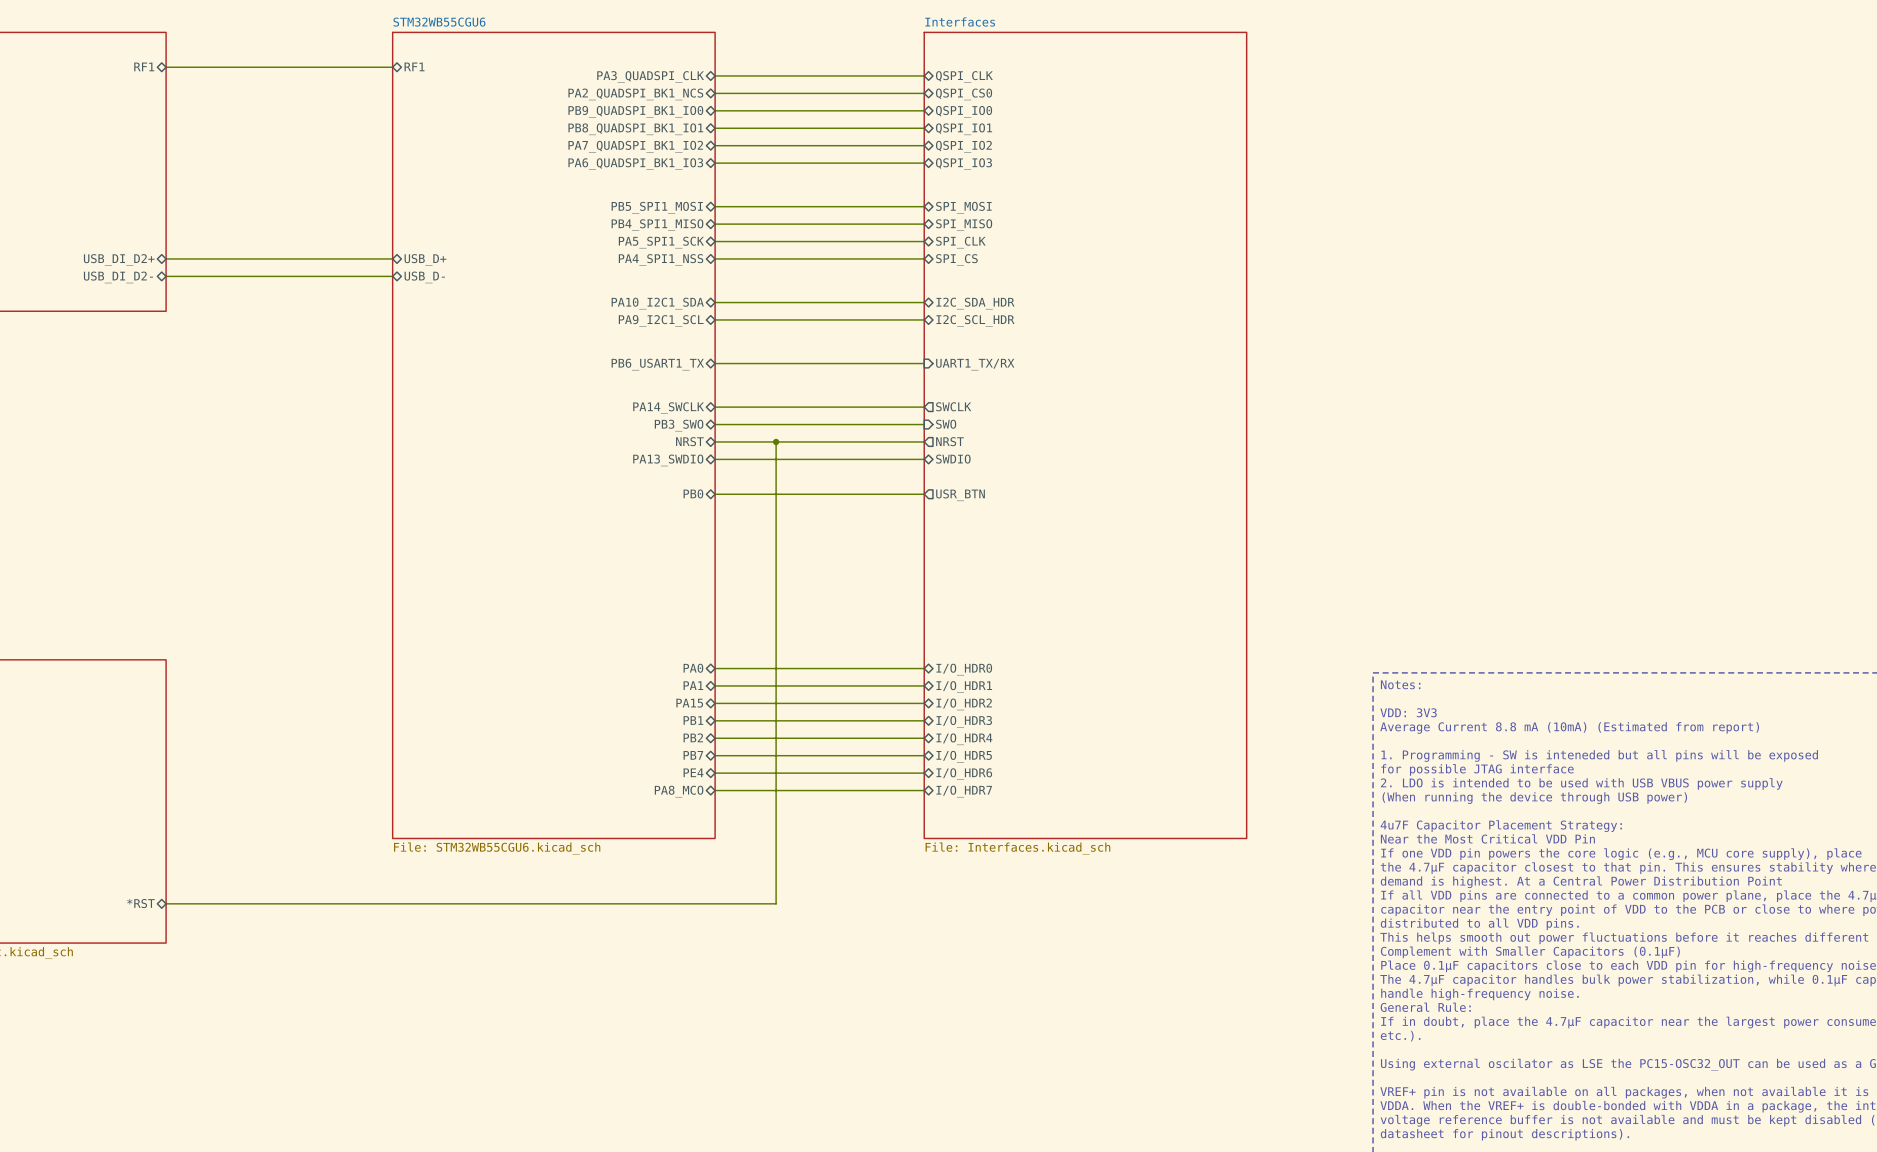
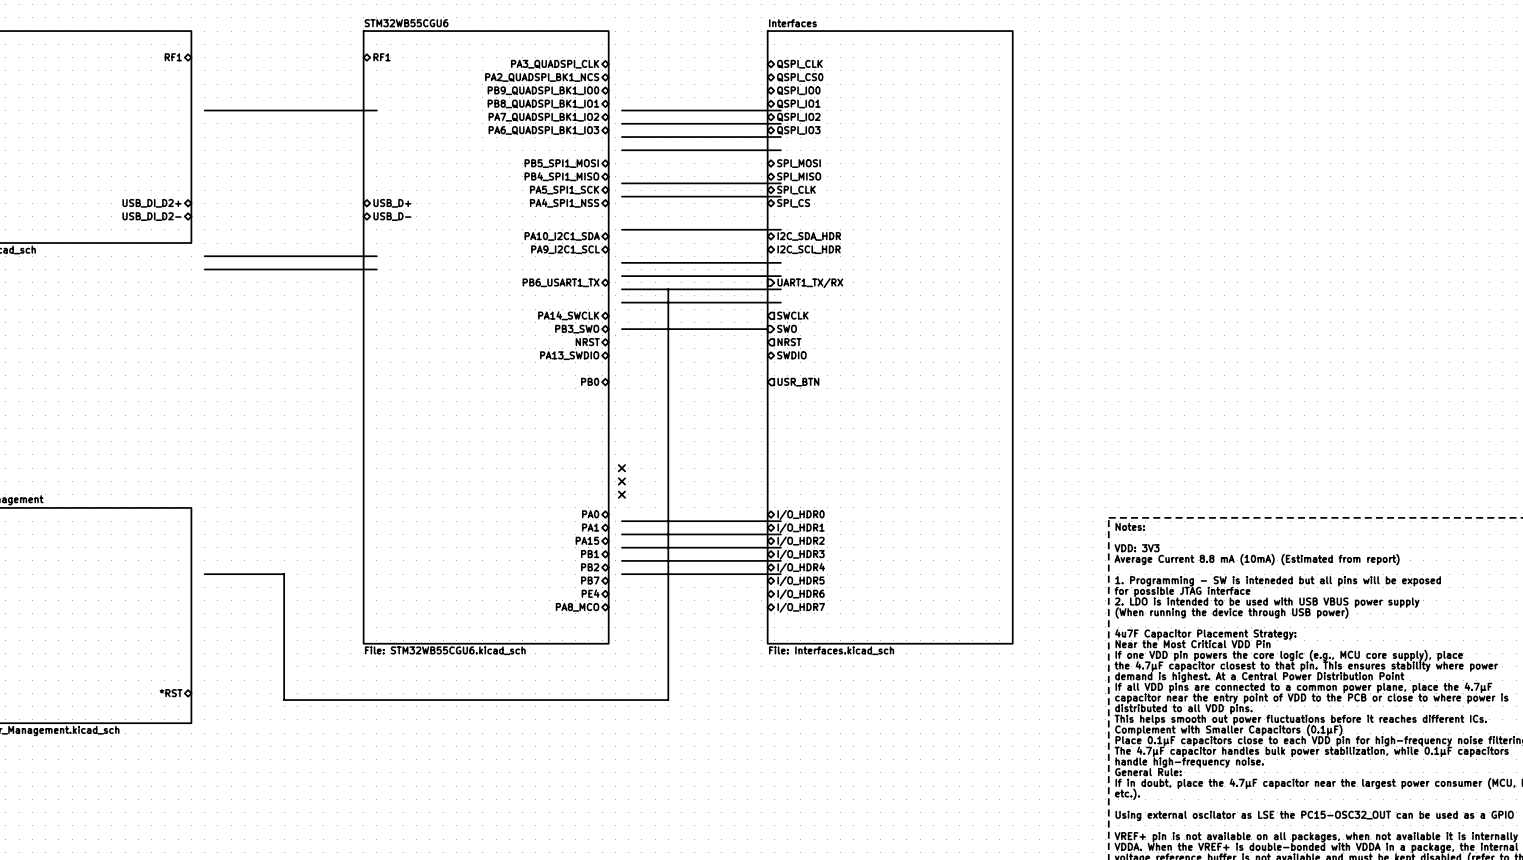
wire: (166, 67) (392, 67) -> (204, 110) (376, 110)
wire: (715, 75) (924, 75) -> none
wire: (715, 93) (924, 93) -> none
wire: (715, 110) (924, 110) -> none
wire: (715, 128) (924, 128) -> (621, 110) (780, 110)
wire: (715, 145) (924, 145) -> (621, 123) (780, 123)
wire: (715, 163) (924, 163) -> (621, 137) (780, 137)
wire: (715, 206) (924, 206) -> none
wire: (715, 224) (924, 224) -> (621, 183) (780, 183)
wire: (715, 241) (924, 241) -> (621, 196) (780, 196)
wire: (166, 258) (392, 258) -> (204, 256) (376, 256)
wire: (715, 258) (924, 258) -> (621, 150) (780, 150)
wire: (166, 276) (392, 276) -> (204, 269) (376, 269)
wire: (715, 302) (924, 302) -> (621, 229) (780, 229)
wire: (715, 319) (924, 319) -> none
wire: (715, 363) (924, 363) -> (621, 276) (780, 276)
wire: none -> (668, 289) (668, 700) (284, 700) (284, 574) (204, 574)
wire: (715, 407) (924, 407) -> (621, 262) (780, 262)
wire: (715, 424) (732, 424) -> none
wire: (715, 441) (924, 441) -> (621, 289) (780, 289)
wire: (776, 441) (776, 903) (166, 903) -> none
junction: (776, 441) -> none
wire: (715, 459) (924, 459) -> (621, 302) (780, 302)
wire: (715, 494) (924, 494) -> none
no-connect mark: none -> (621, 468)
no-connect mark: none -> (621, 481)
no-connect mark: none -> (621, 494)
wire: (715, 668) (924, 668) -> (621, 521) (780, 521)
wire: (715, 685) (924, 685) -> (621, 534) (780, 534)
wire: (715, 703) (924, 703) -> (621, 547) (780, 547)
wire: (715, 720) (924, 720) -> (621, 560) (780, 560)
wire: (715, 738) (924, 738) -> none
wire: (715, 755) (924, 755) -> (621, 574) (780, 574)
wire: (715, 773) (924, 773) -> none
wire: (715, 790) (924, 790) -> none

